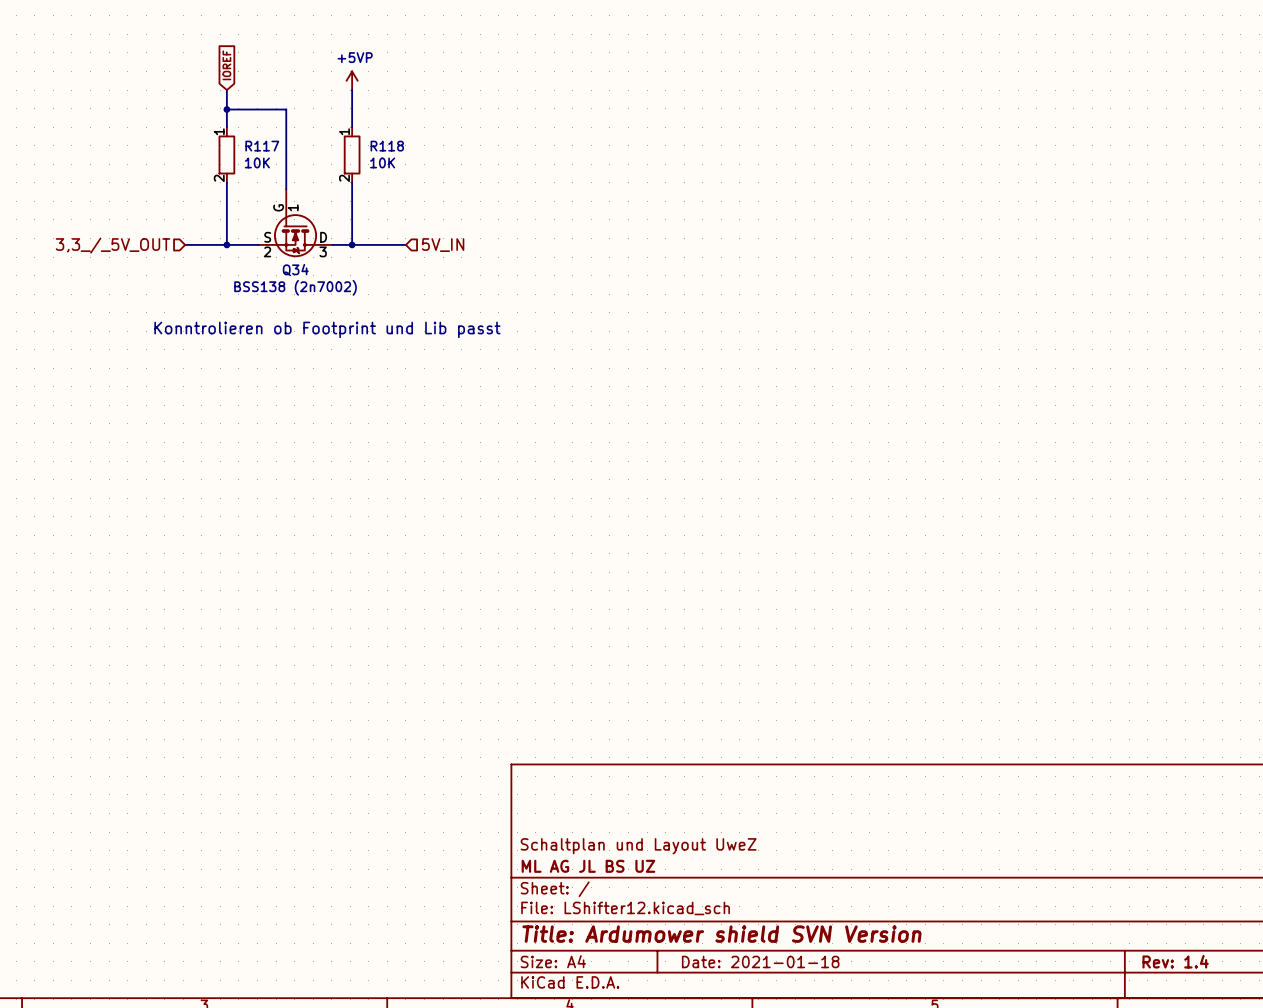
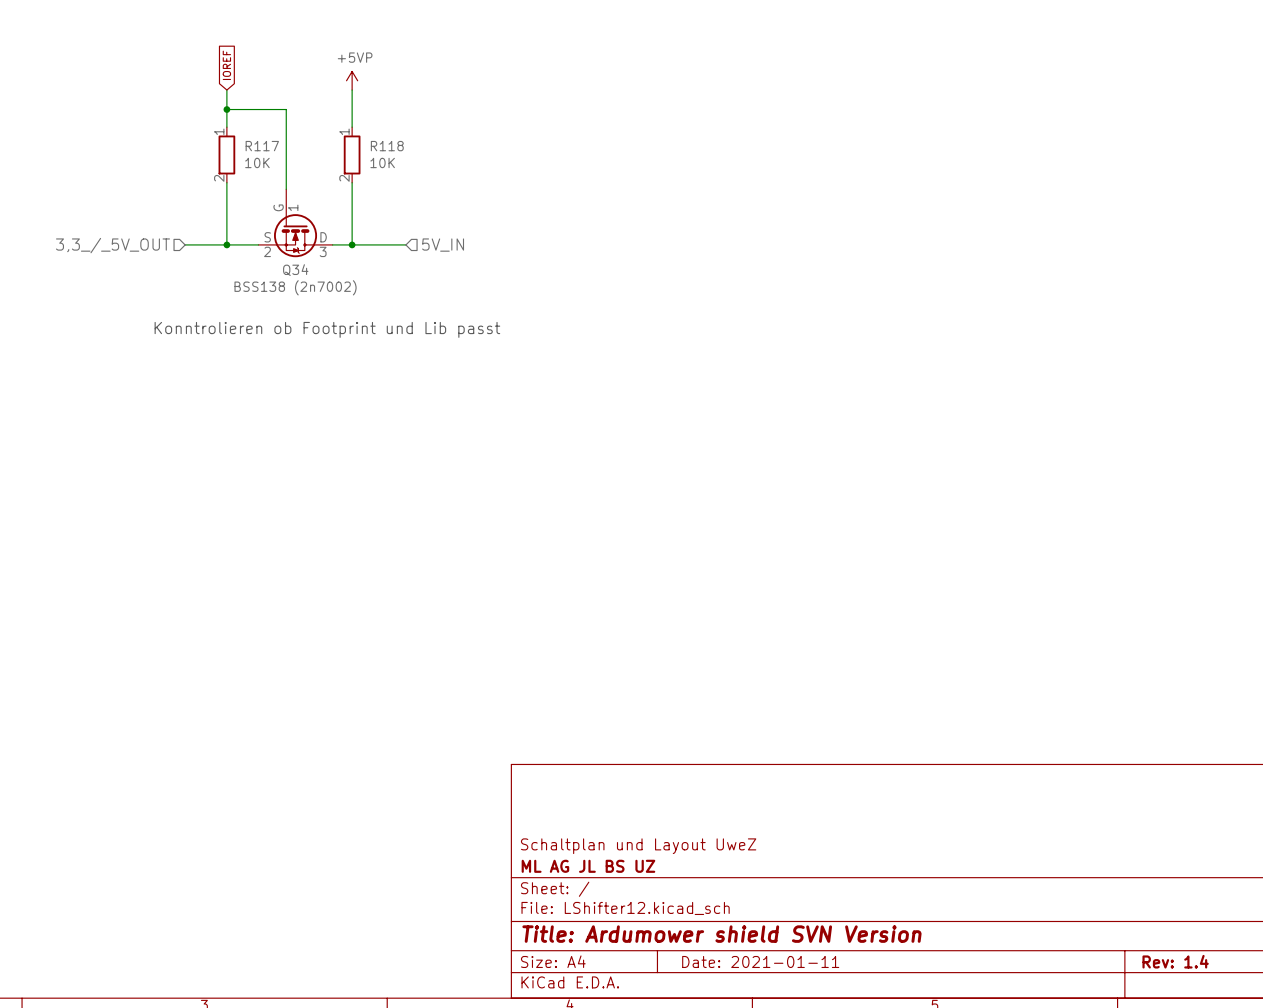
title block: Date: 2021-01-18 (760, 961) -> Date: 2021-01-11 (760, 961)

